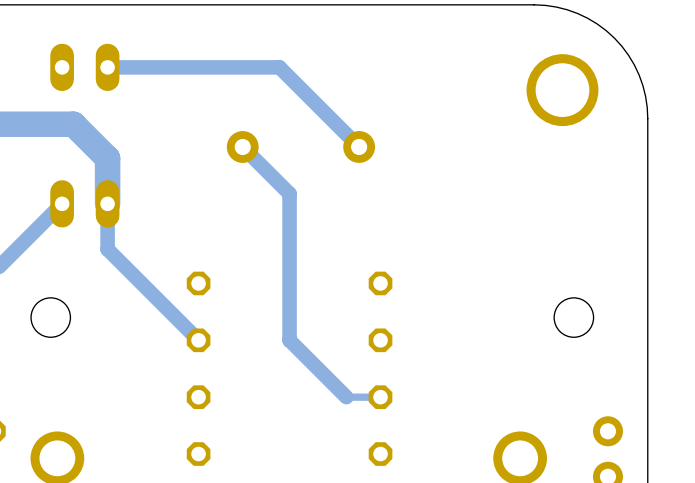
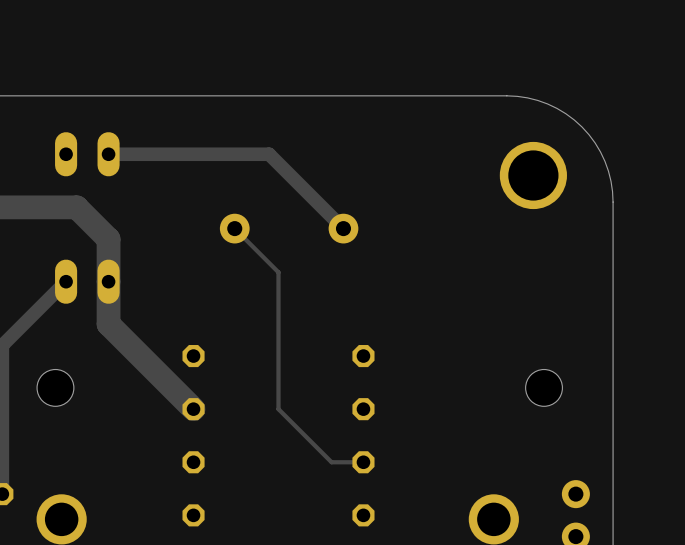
track width: thick (242, 146) (289, 193) (289, 340) (346, 397) (380, 397) -> thin (234, 228) (278, 272) (278, 409) (331, 462) (363, 462)
track width: thin (107, 203) (107, 249) (198, 340) -> thick (108, 281) (108, 324) (193, 409)

